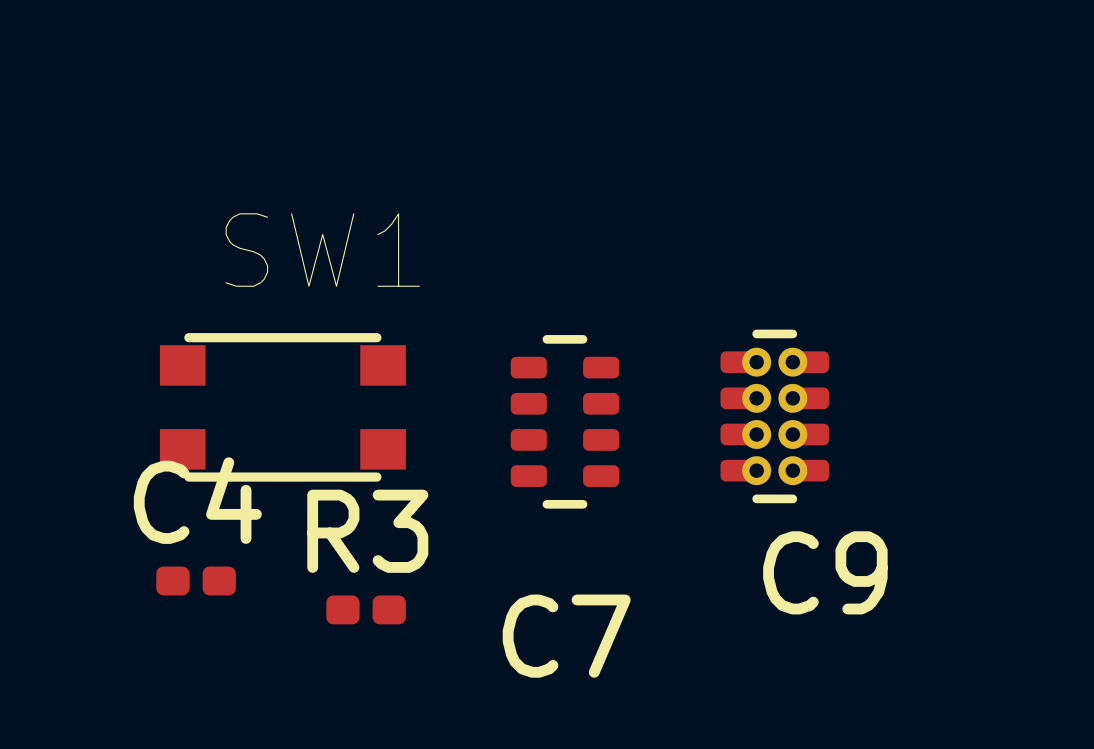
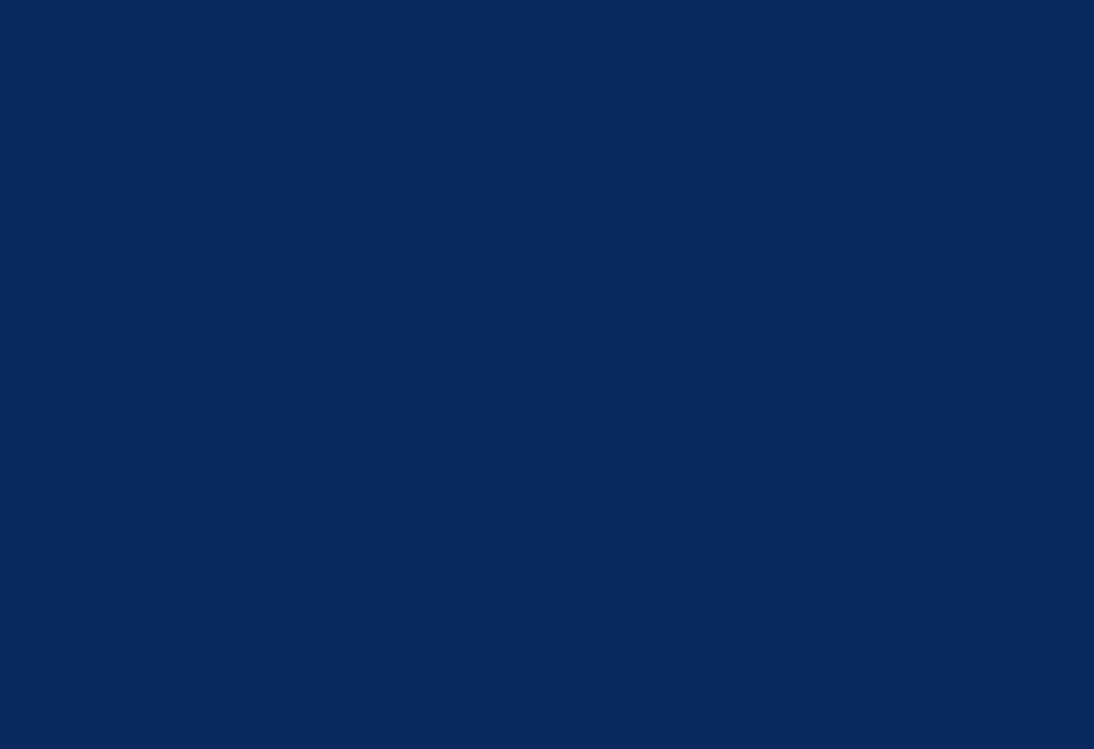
SW1: (282, 407) -> none
C9: (774, 416) -> none
C7: (564, 421) -> none
C4: (196, 580) -> none
R3: (366, 609) -> none

